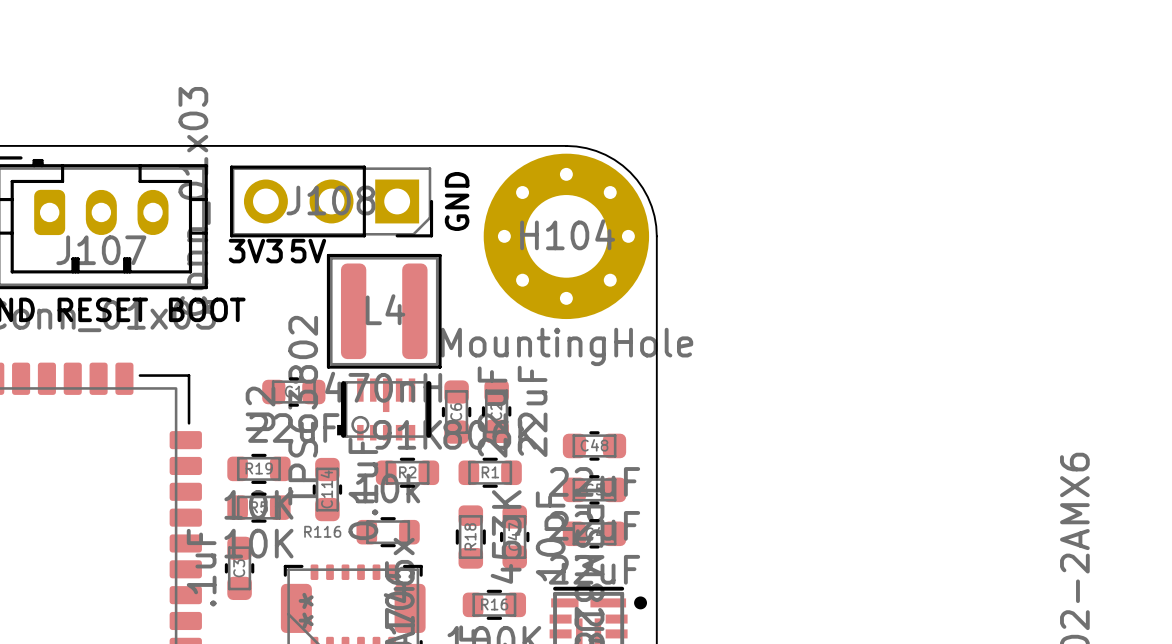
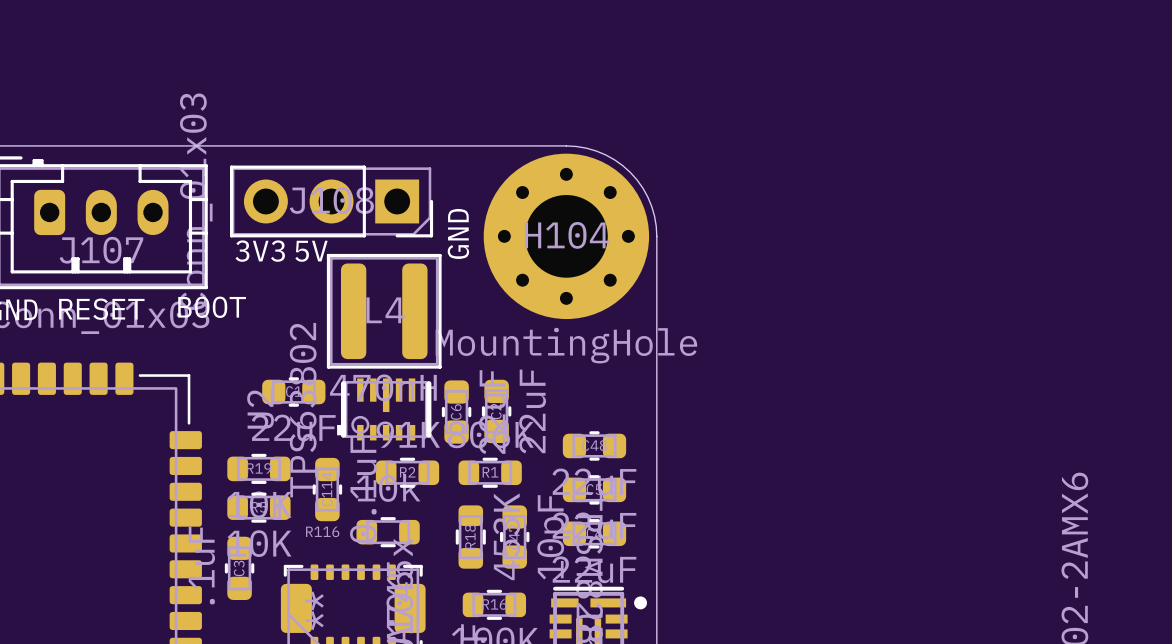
text position: GND (457, 201) -> GND (458, 233)
text: none -> BOOT (212, 307)
text: RESET (102, 309) -> none
text: BOOT (207, 309) -> RESET (101, 309)

